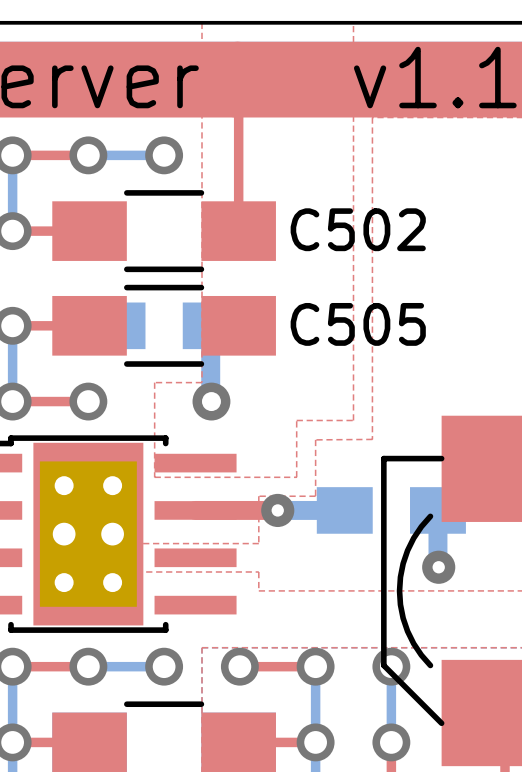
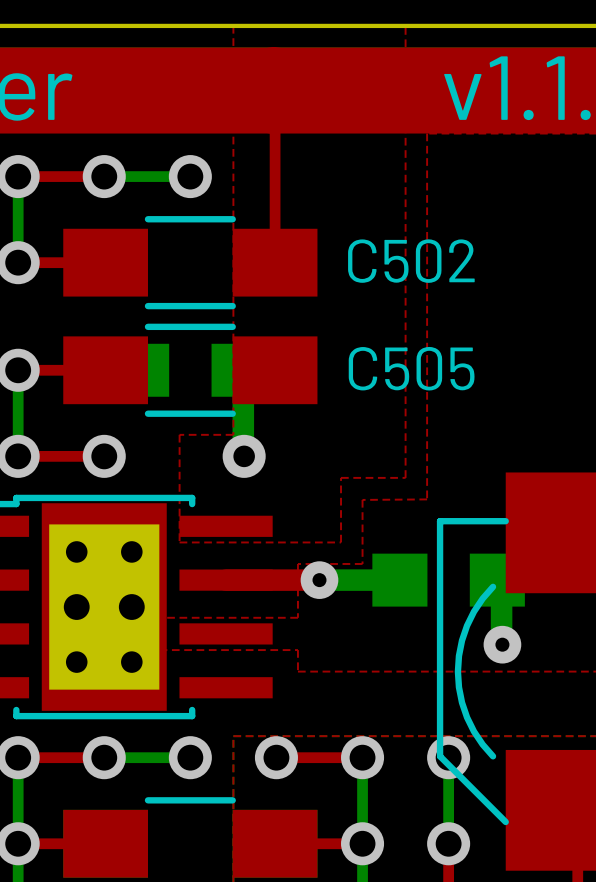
part footprint: [316, 487, 466, 534] -> [372, 553, 525, 607]

